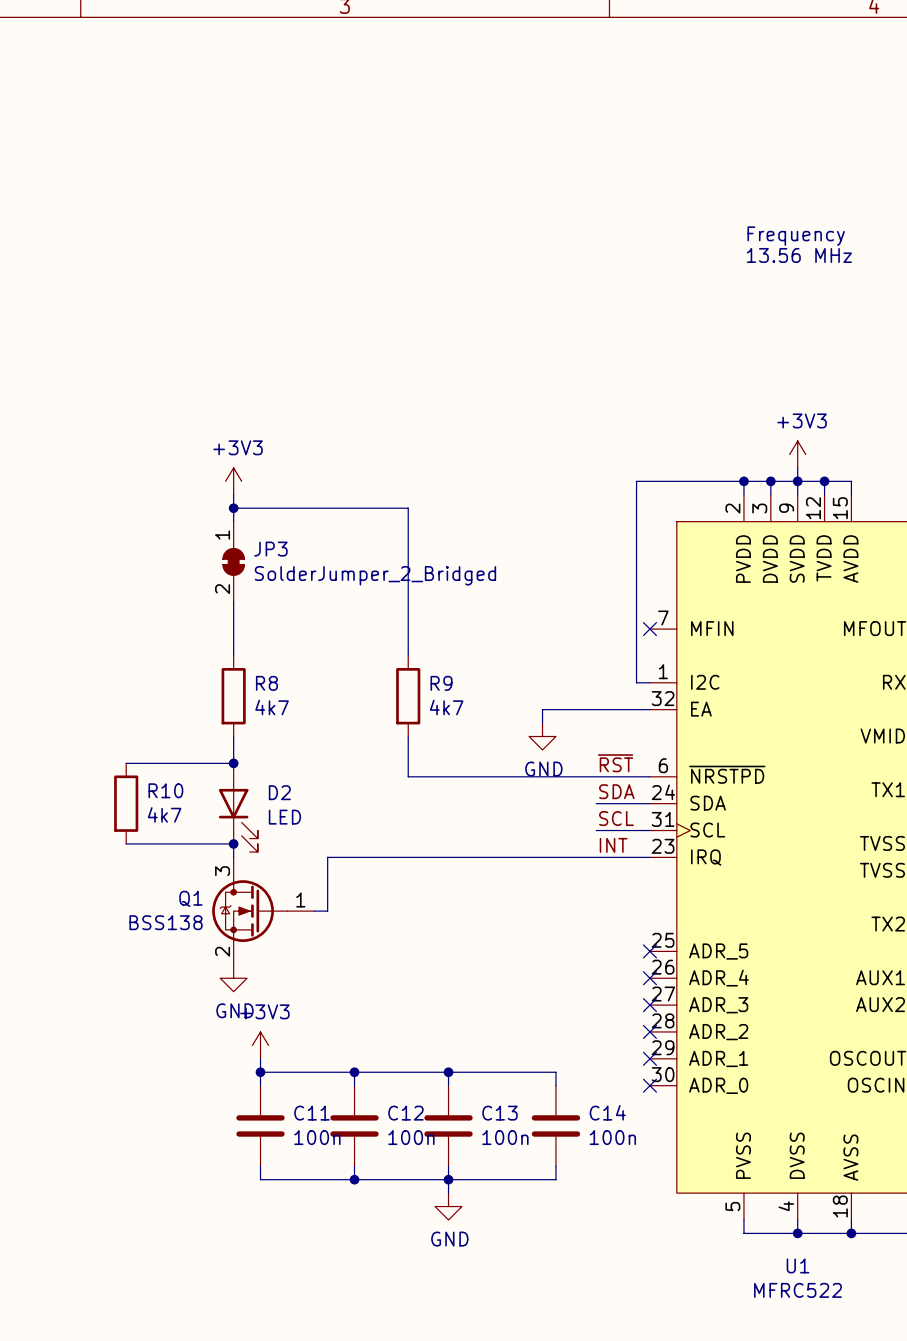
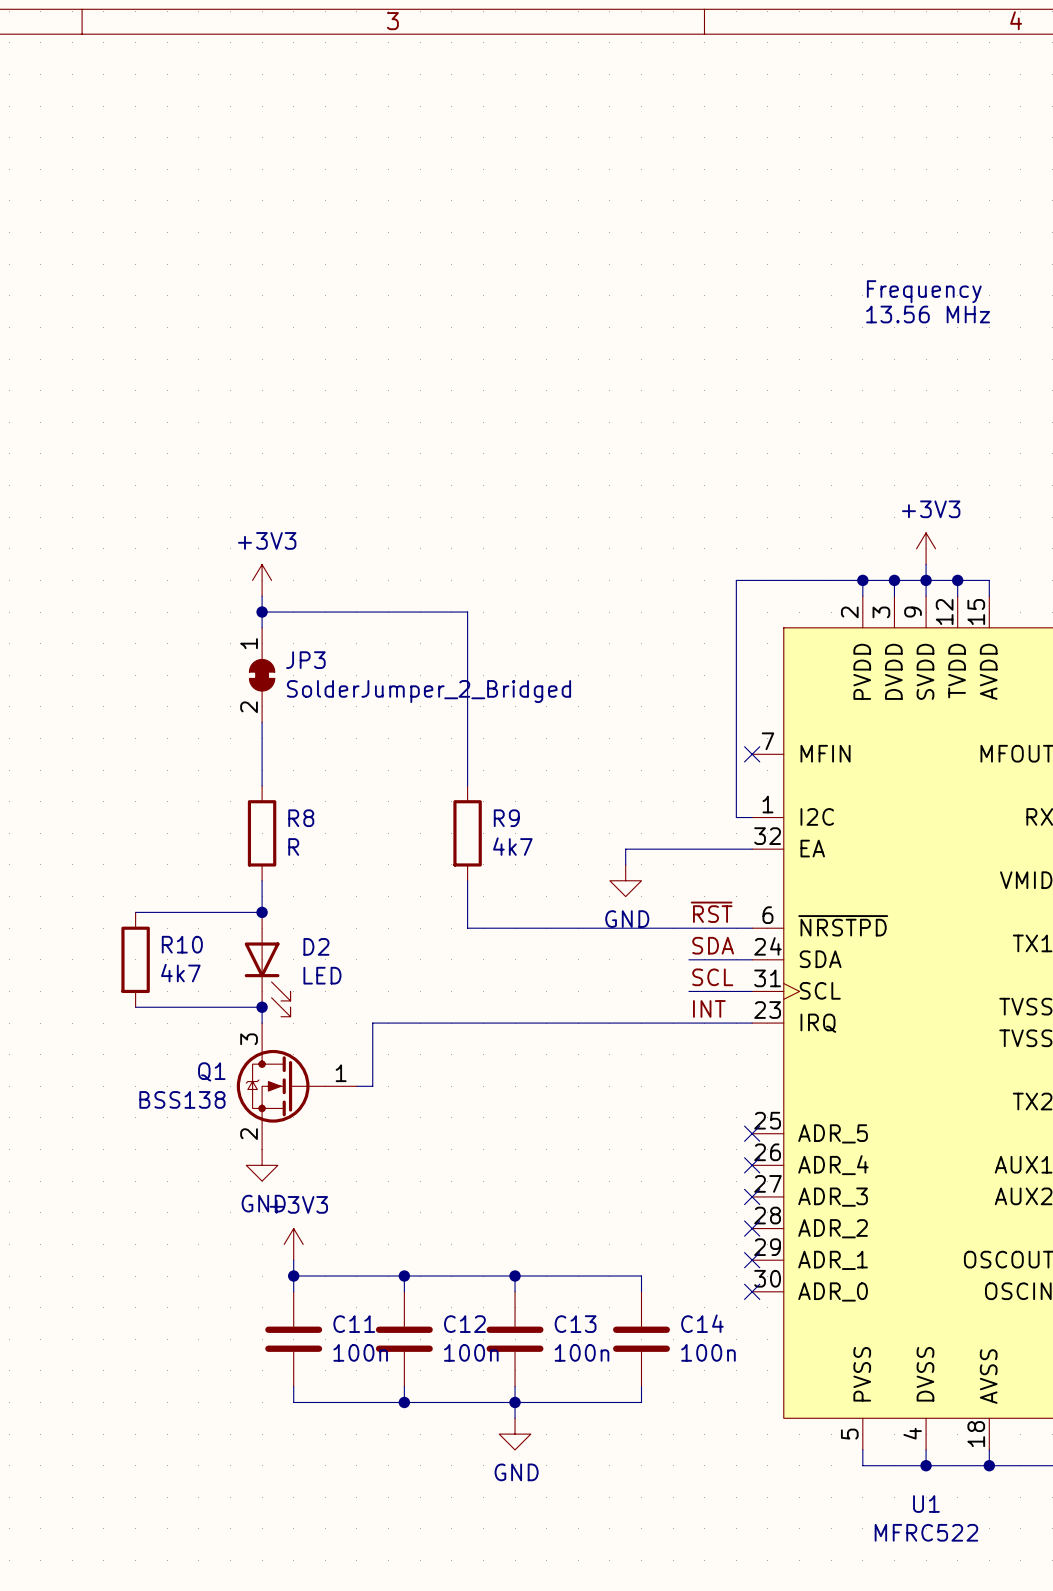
R8 value: 4k7 (272, 707) -> R (293, 846)

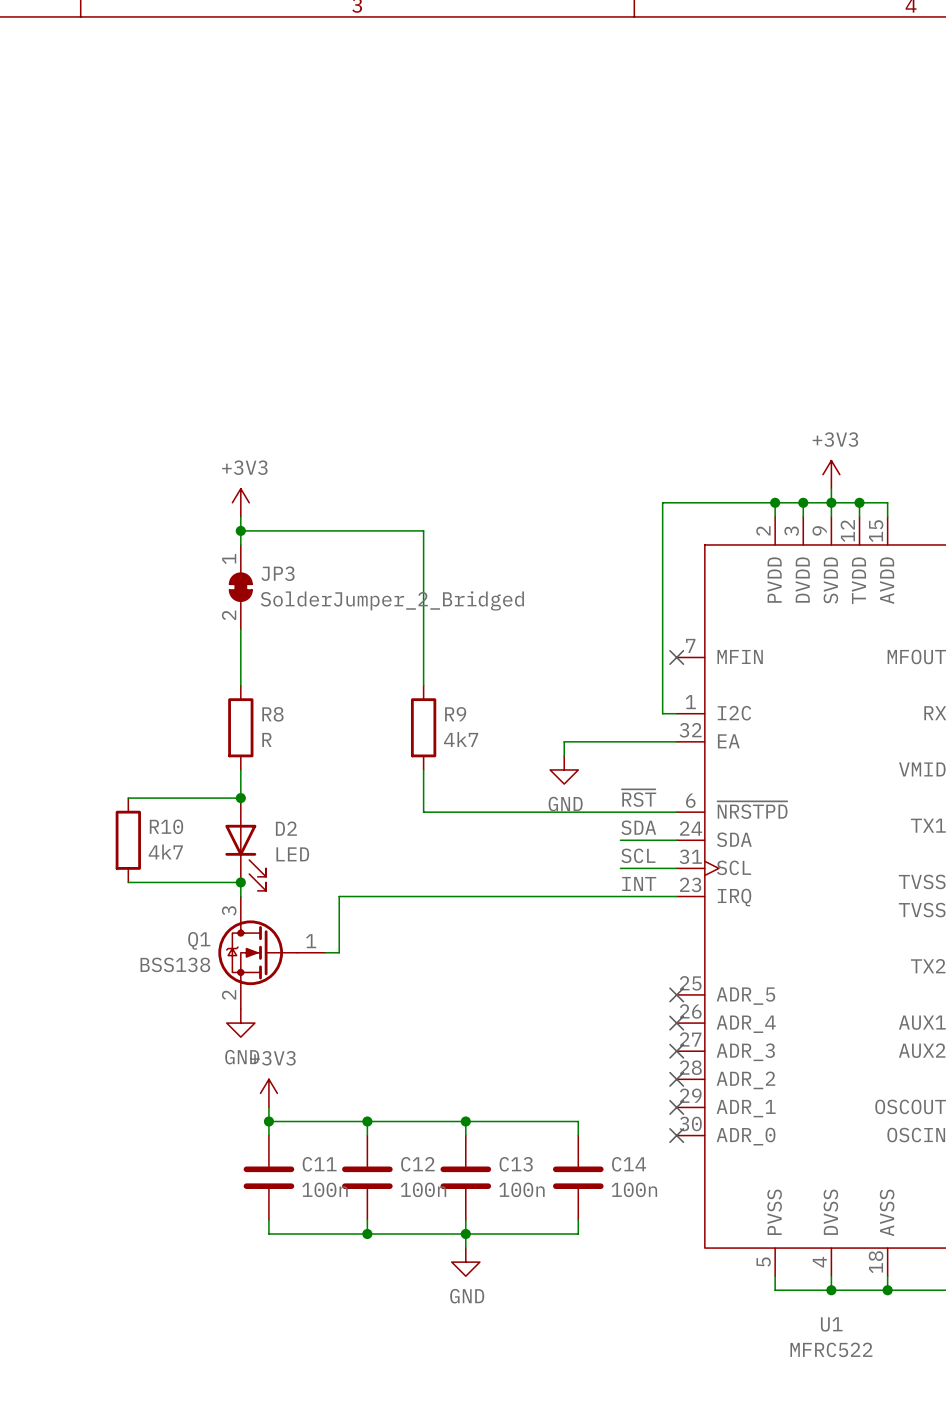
text: Frequency (924, 291) -> none
text: 13.56 MHz (928, 314) -> none

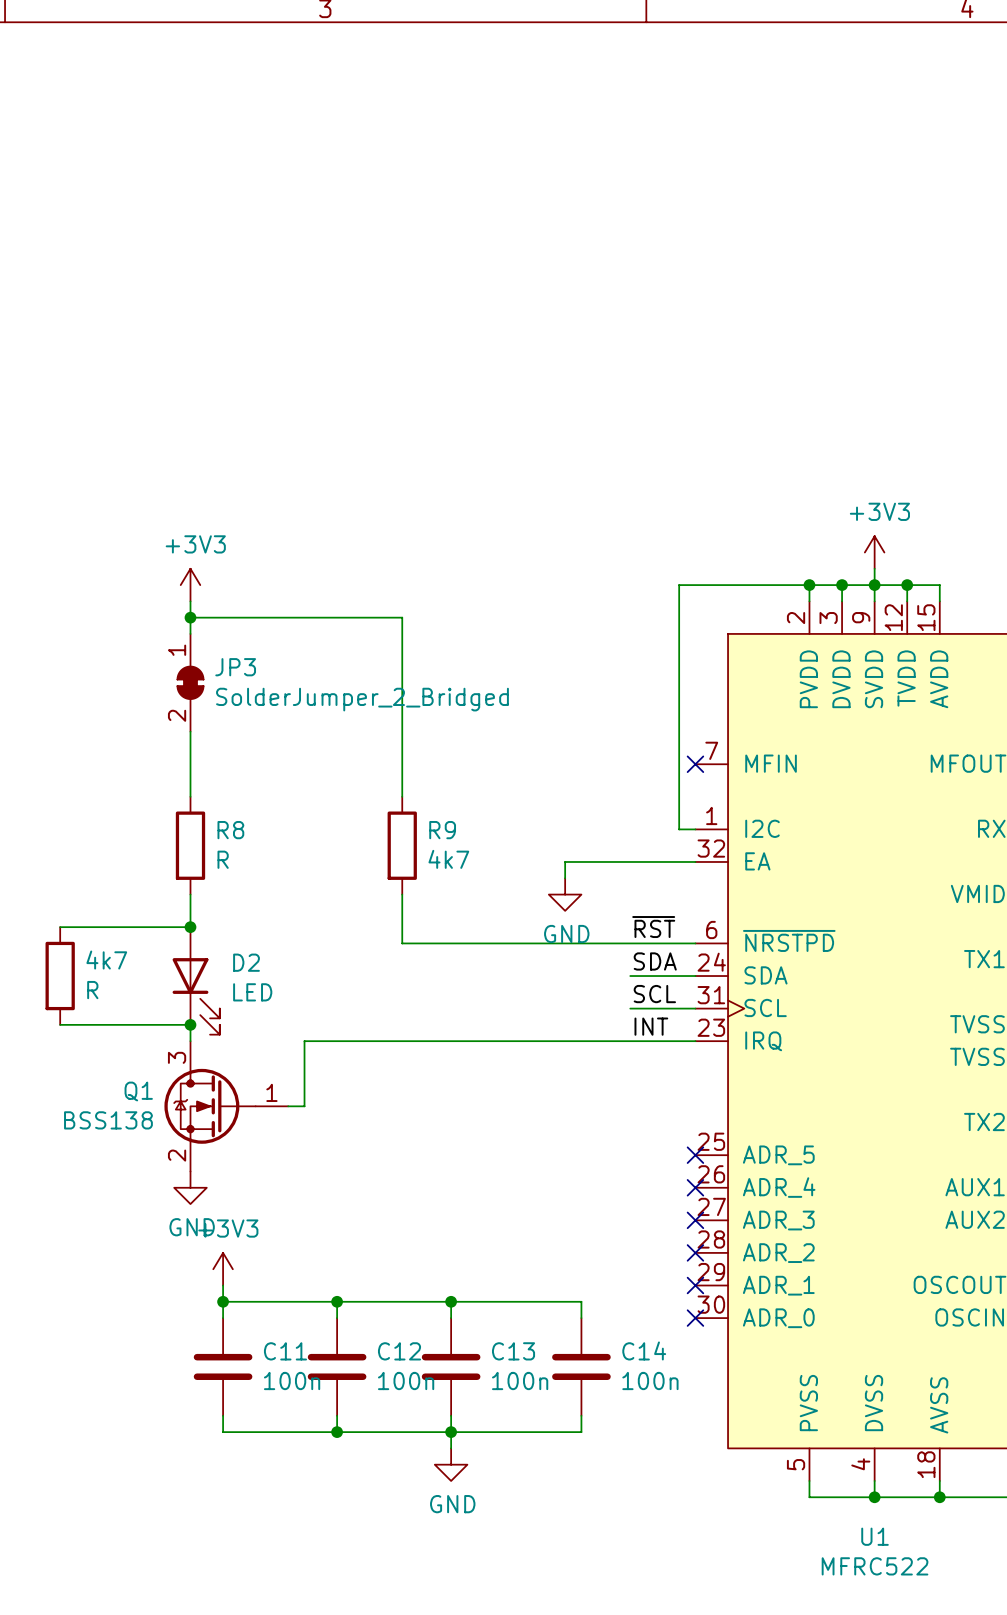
R10 name: R10 (166, 826) -> 4k7 (106, 960)
R10 value: 4k7 (165, 851) -> R (92, 990)

